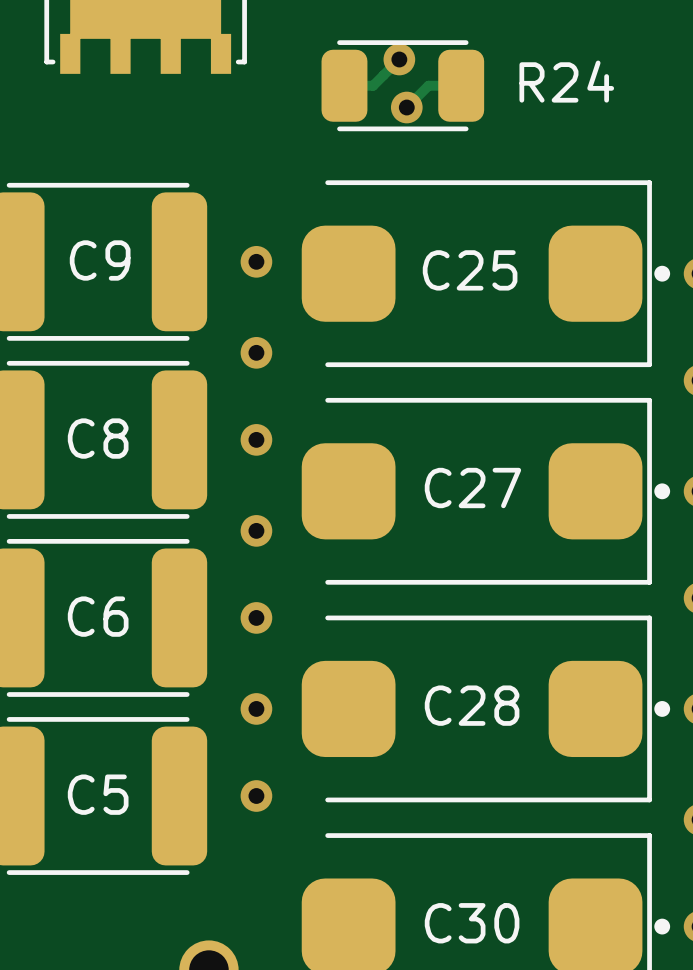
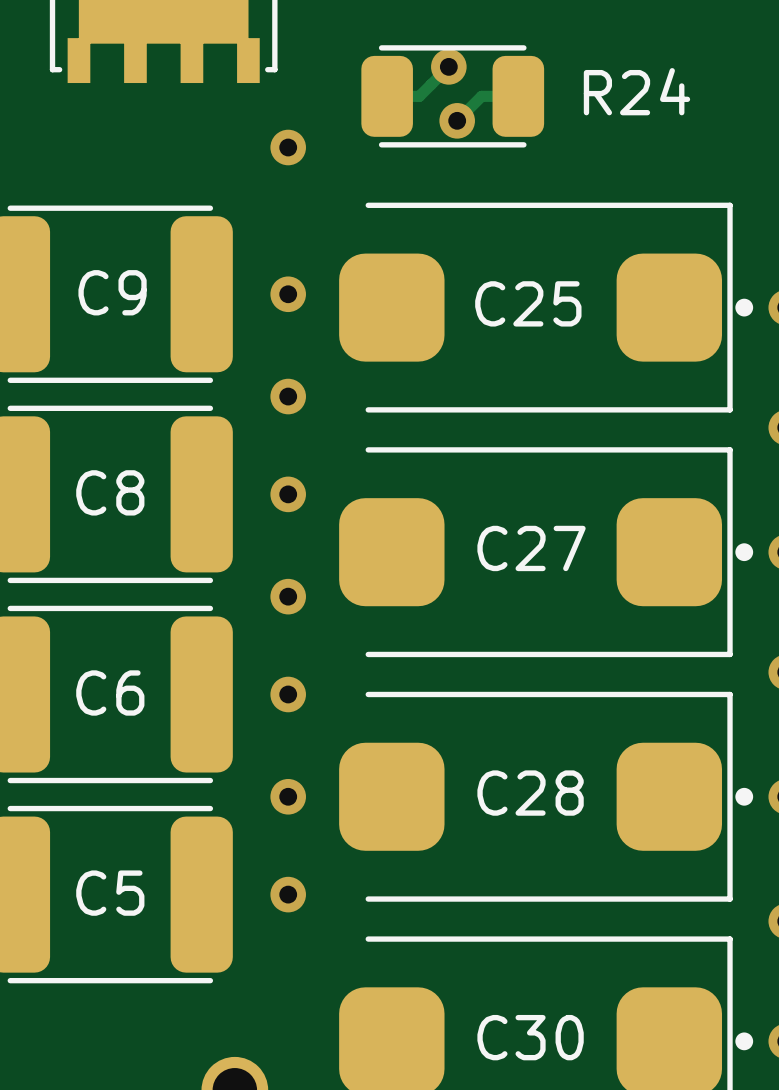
via: none -> (288, 147)

